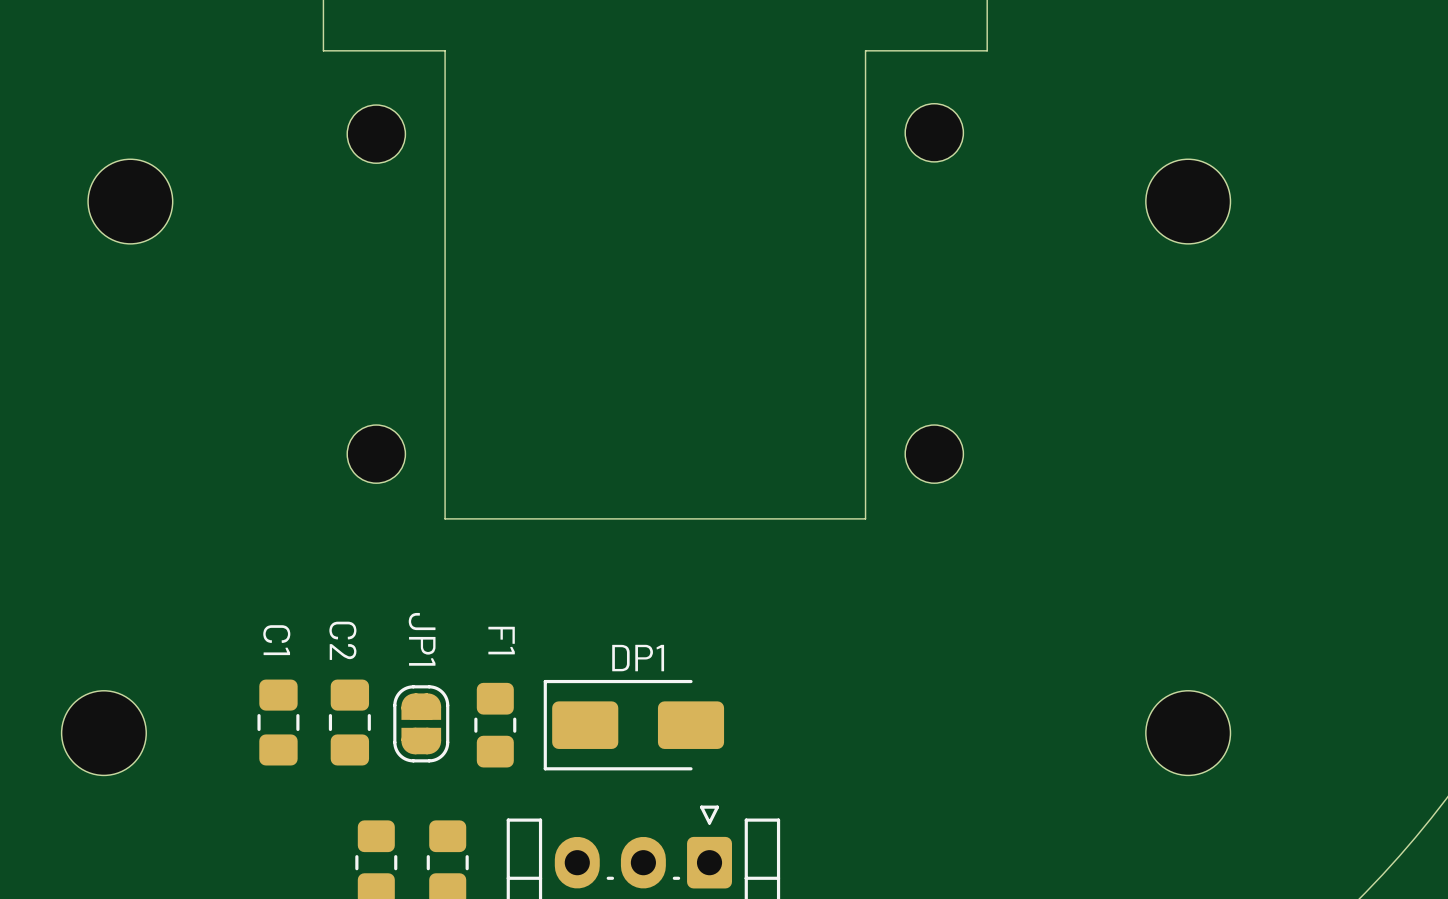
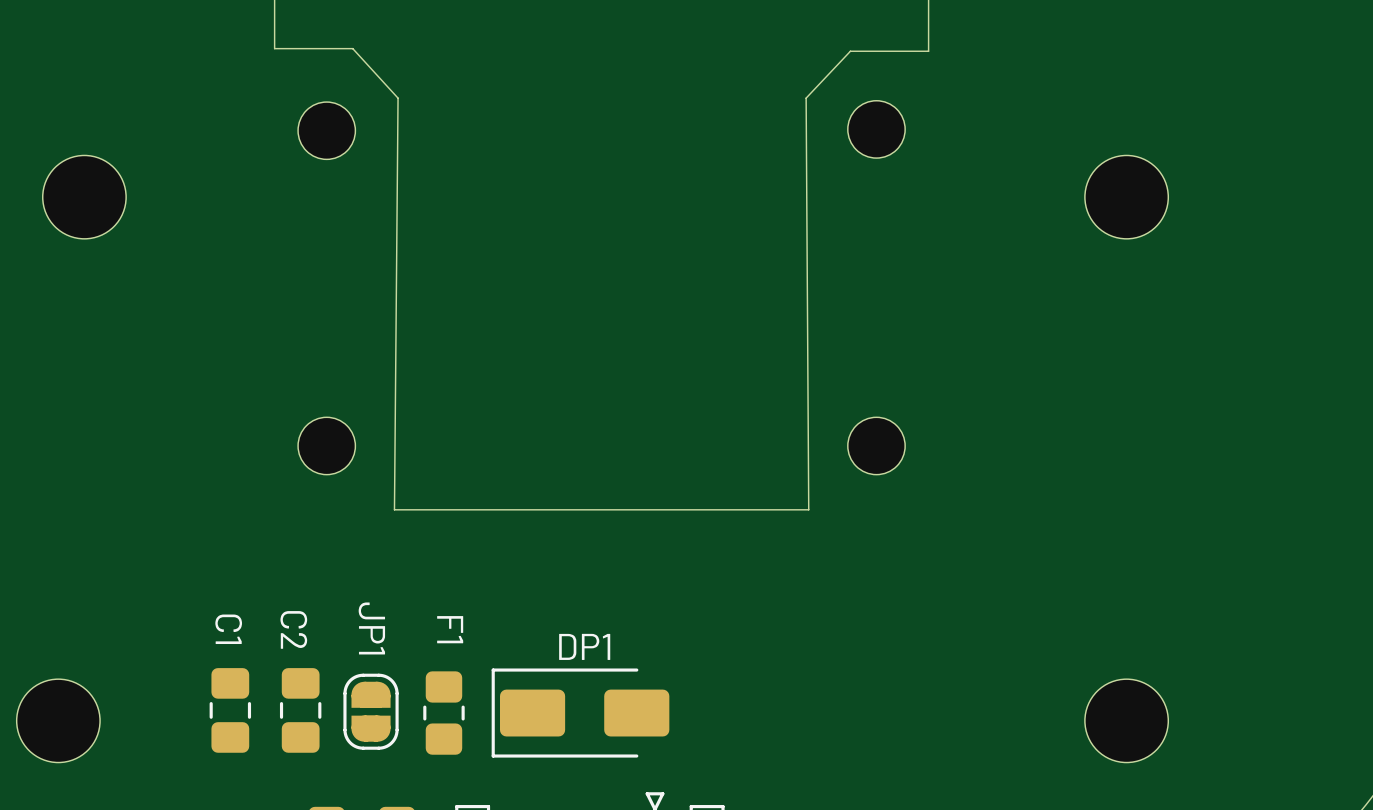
board edge: (402, 50) (445, 50) (445, 518) -> (352, 48) (398, 98) (394, 509)
board edge: (987, 50) (865, 50) (865, 518) -> (928, 48) (928, 51) (850, 51) (806, 98) (808, 509)

